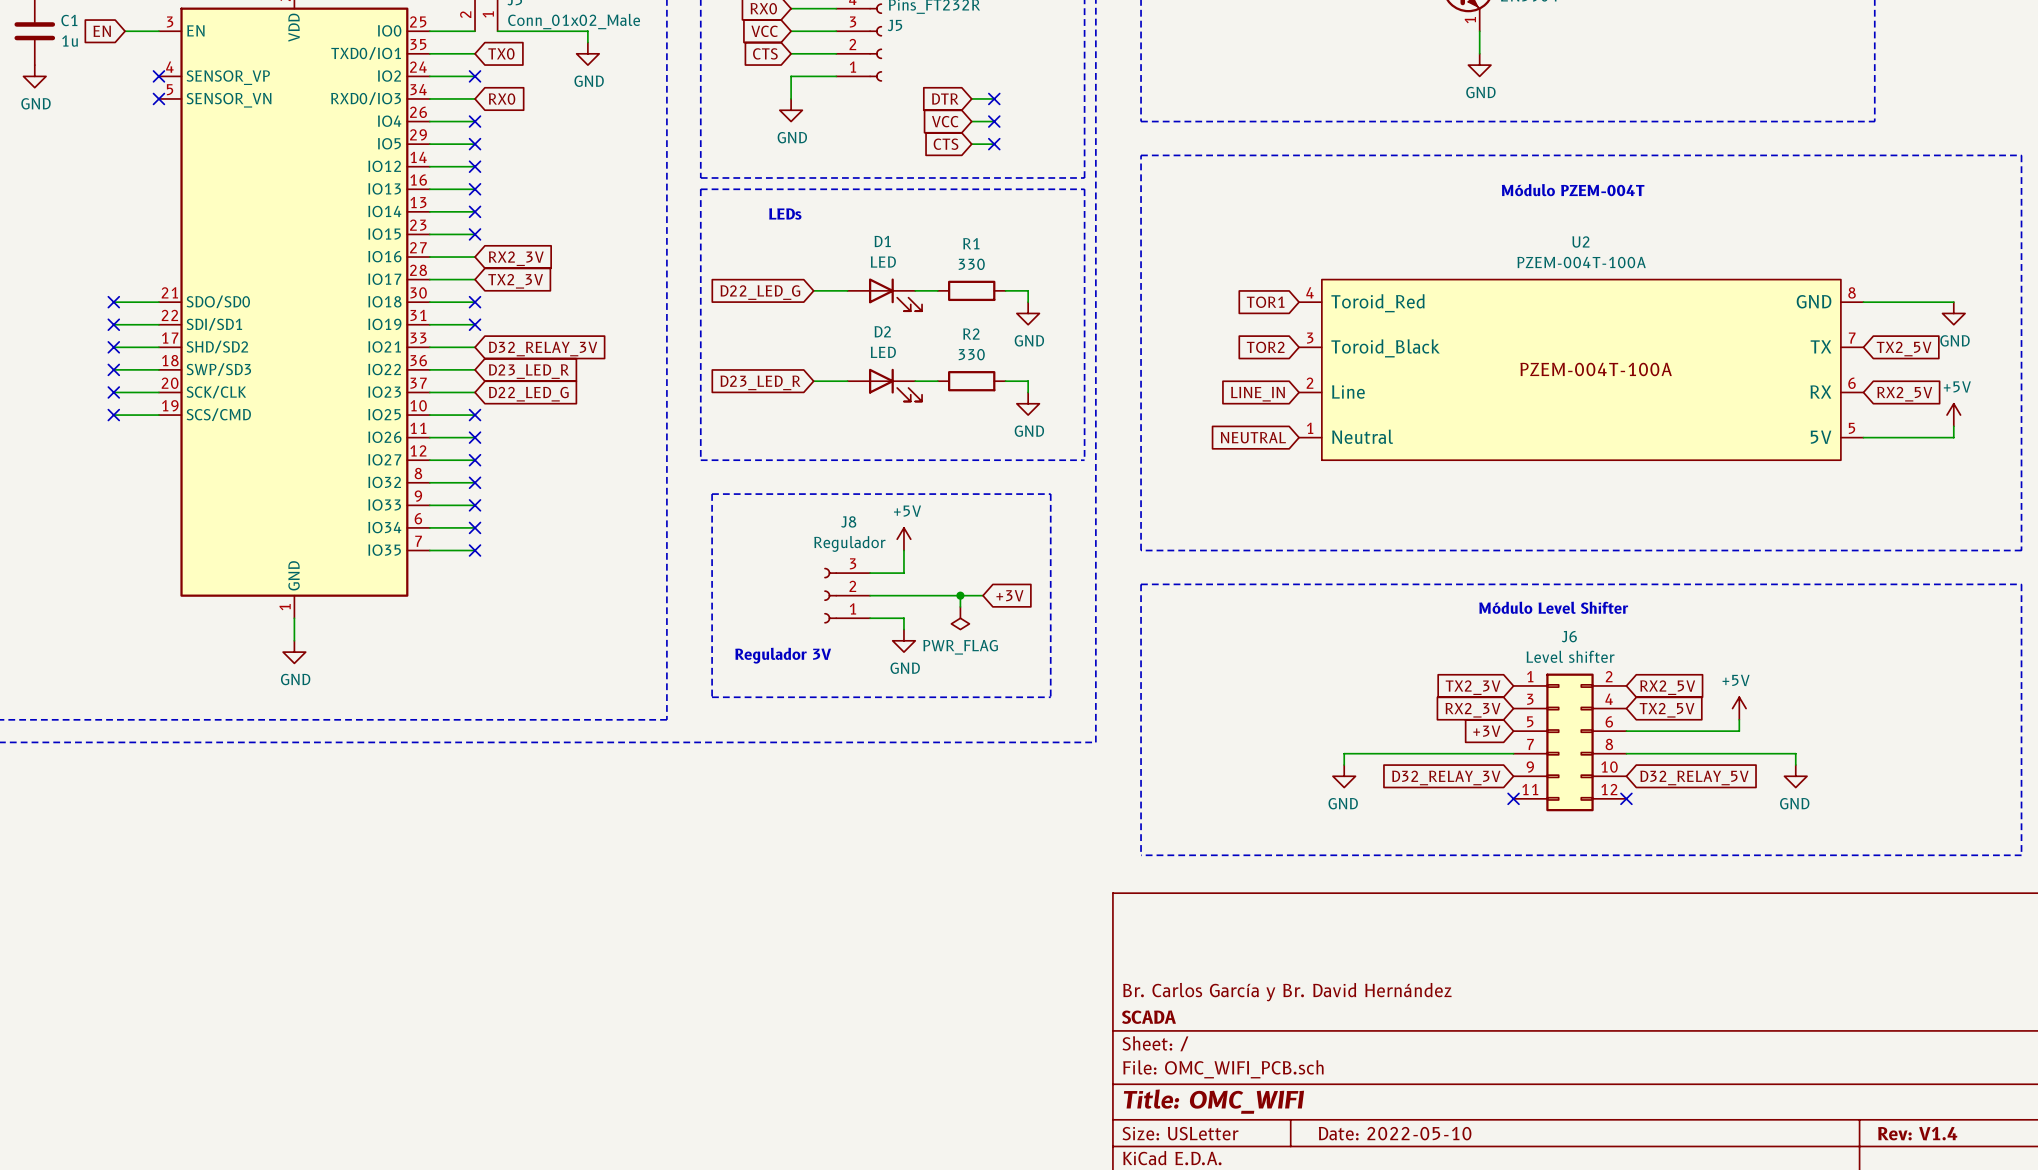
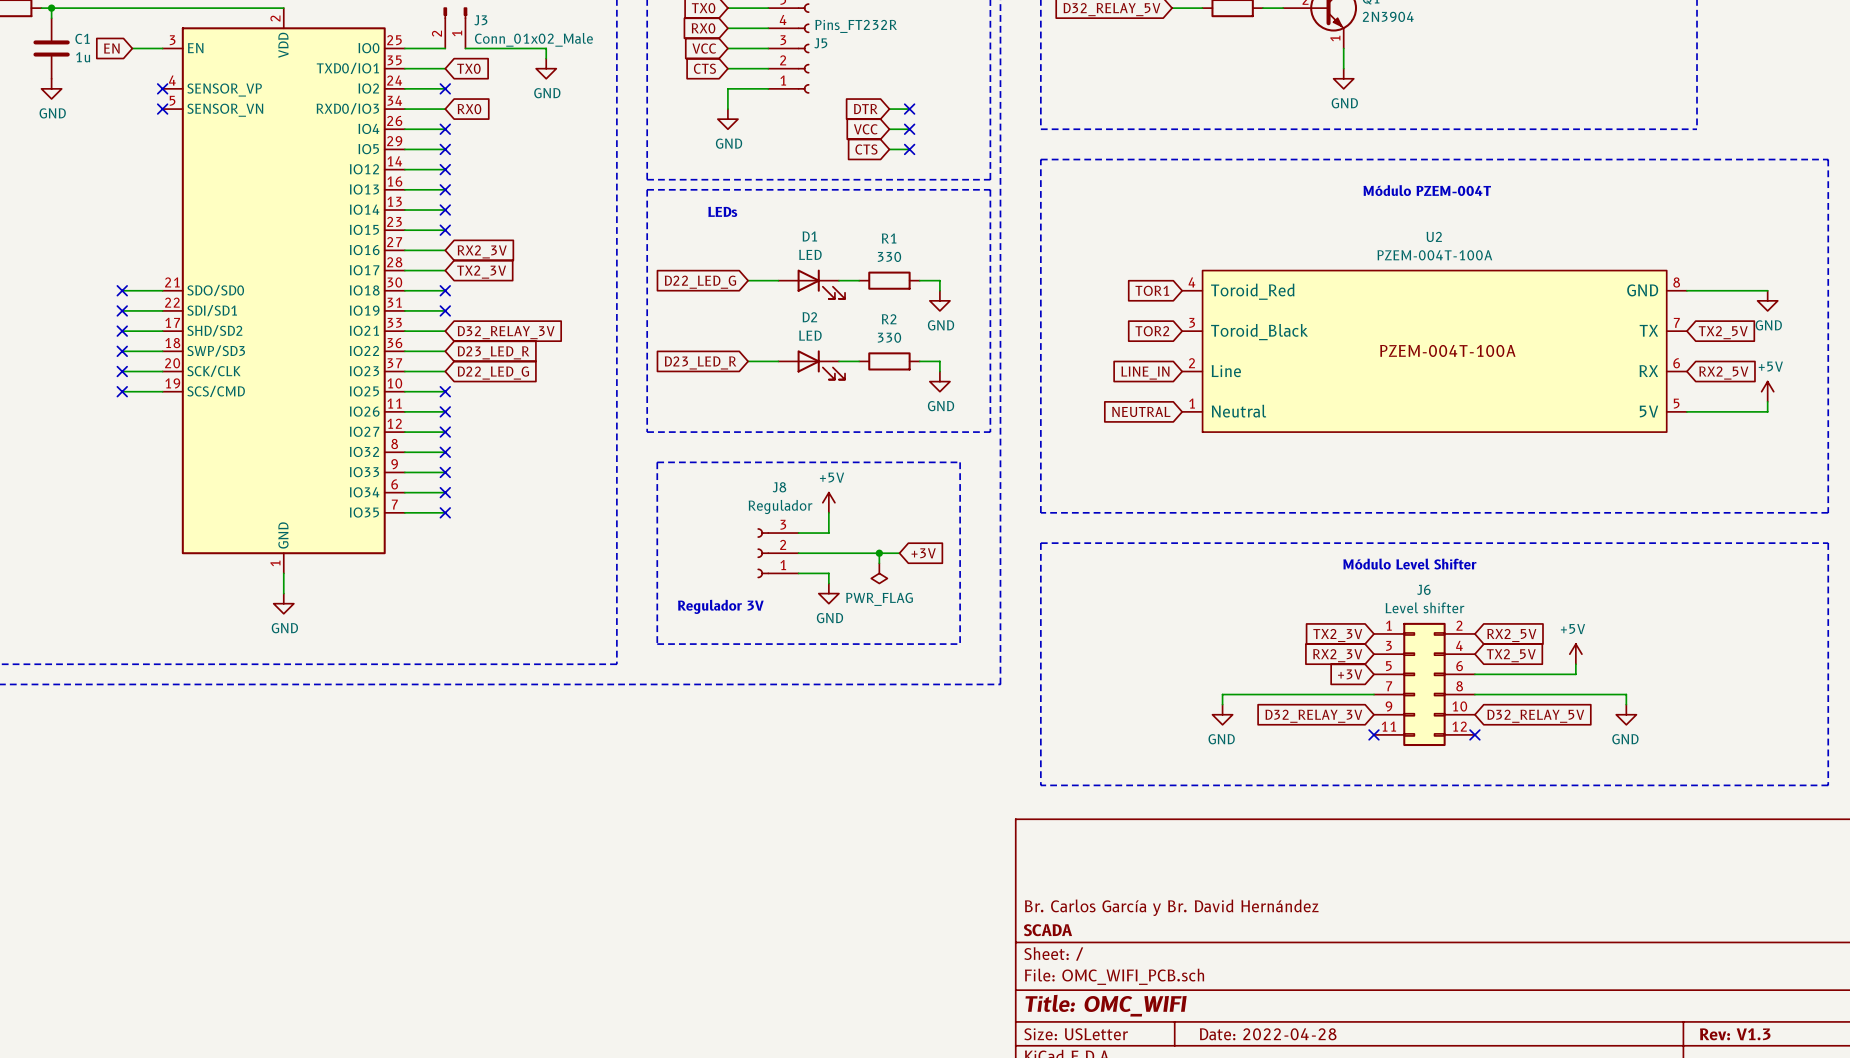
title block: Date: 2022-05-10 (1395, 1133) -> Date: 2022-04-28 (1268, 1034)
title block: Rev: V1.4 (1917, 1133) -> Rev: V1.3 (1735, 1034)

